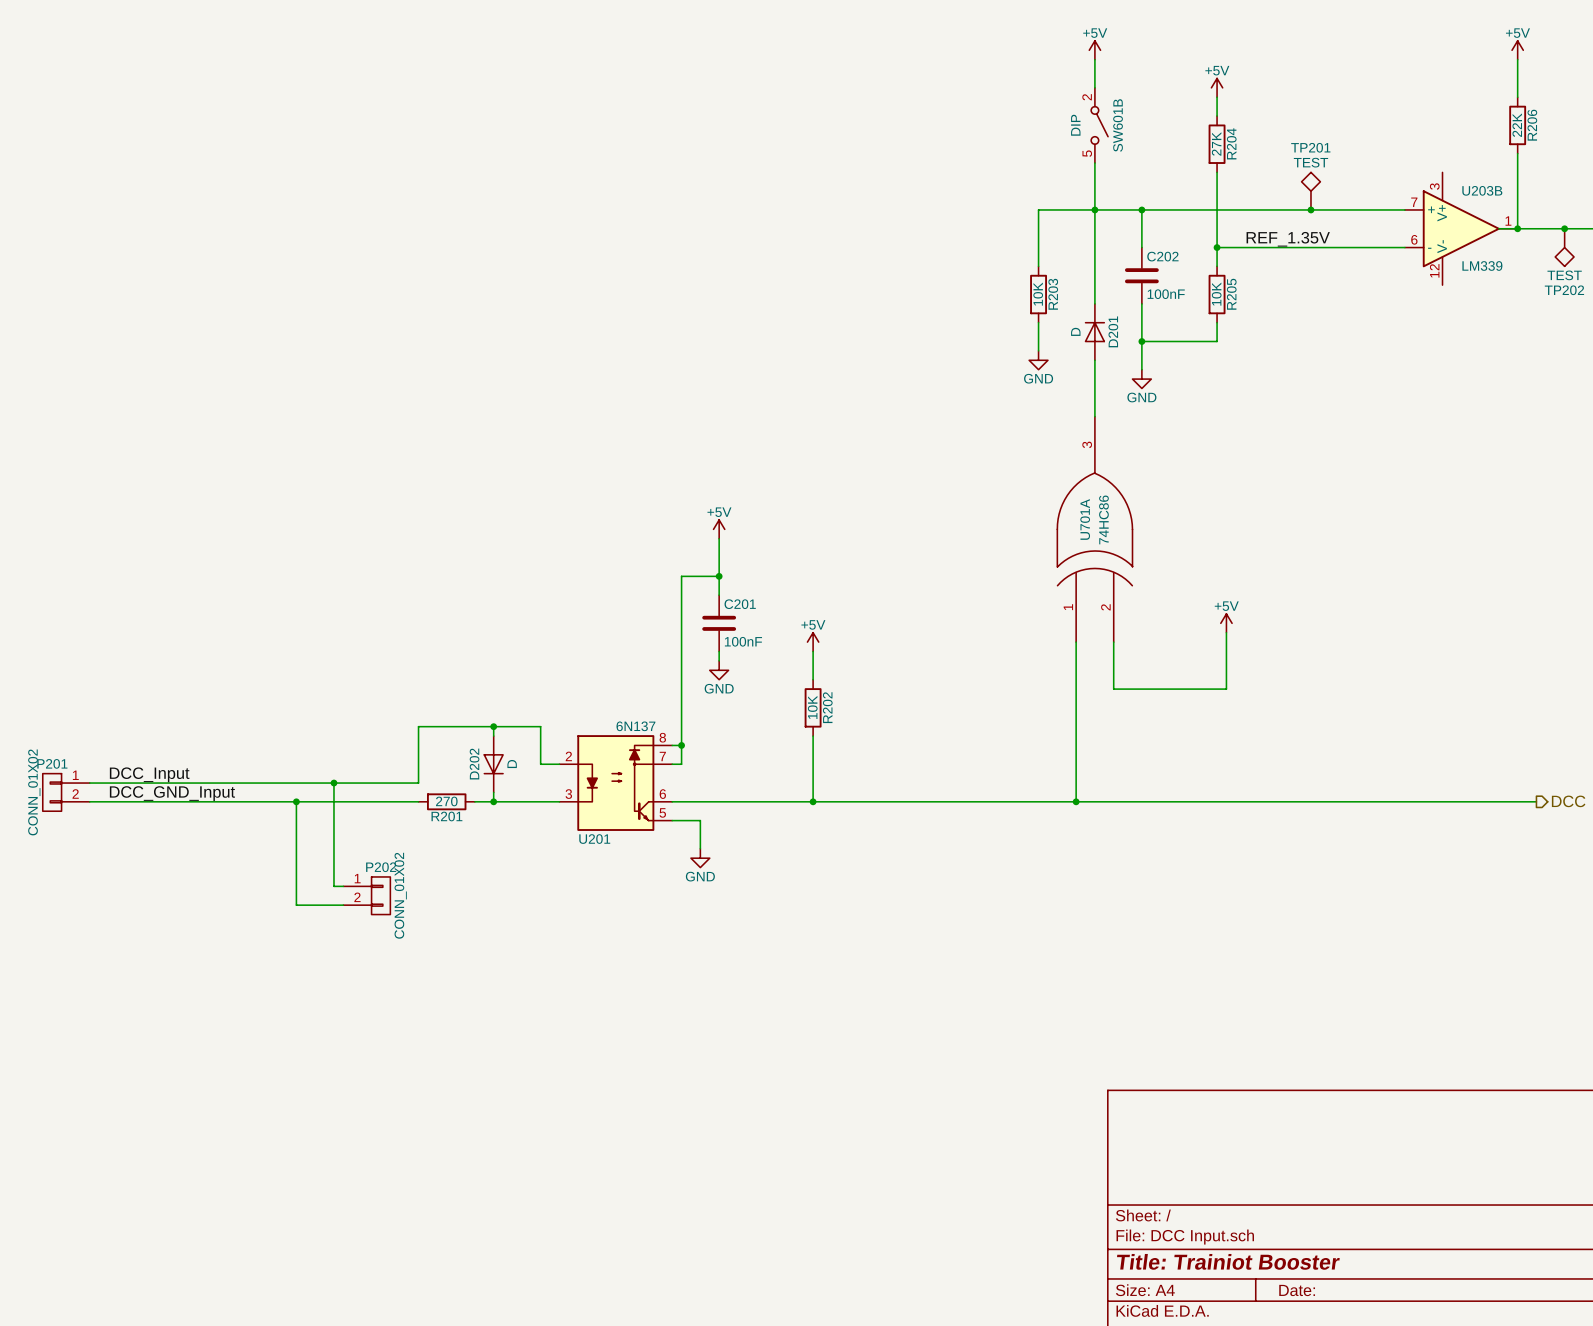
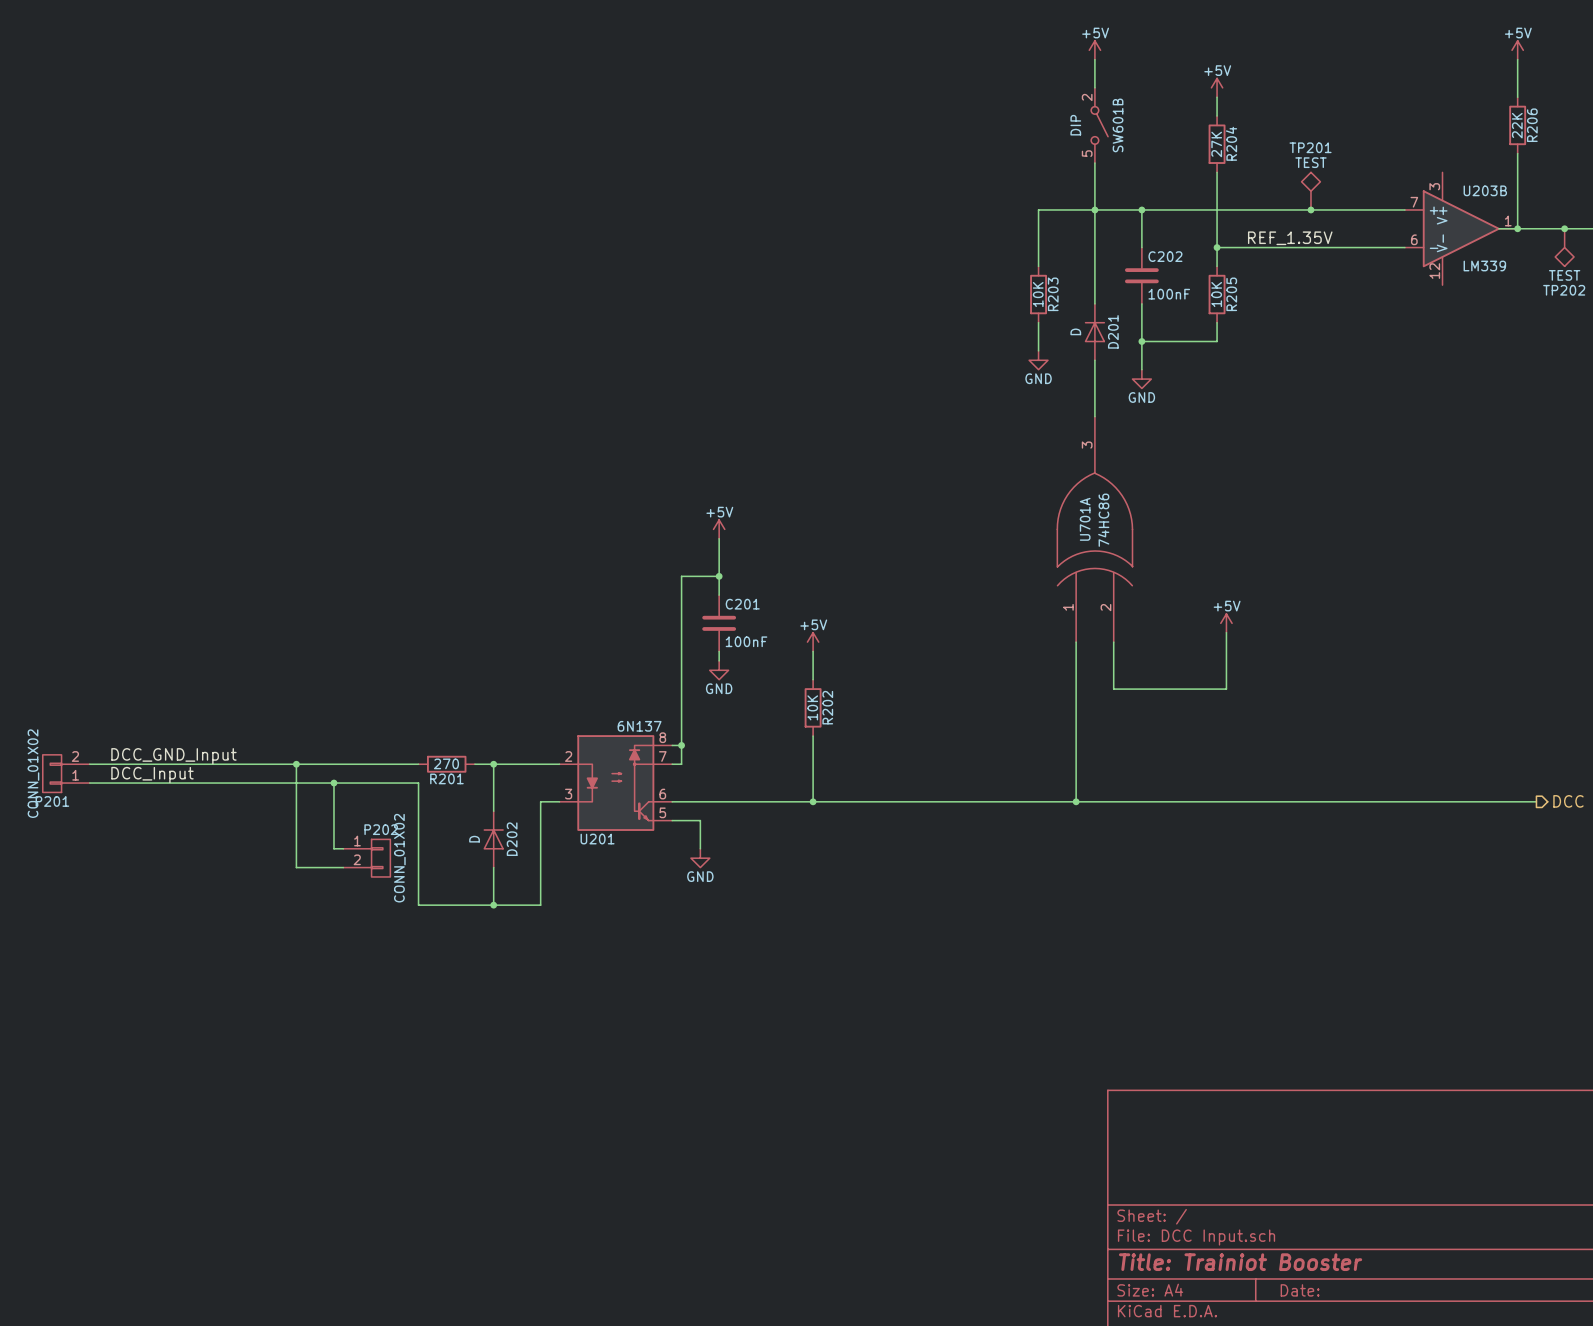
wire: (493, 726) (493, 736) -> (493, 801) (493, 811)
junction: (493, 726) -> none
wire: none -> (296, 764) (296, 801)
D202 rotation: 0° (493, 764) -> 180° (493, 839)
D202 position: (493, 764) -> (493, 839)
junction: none -> (493, 764)
wire: (540, 764) (540, 726) (418, 726) (418, 783) -> (540, 801) (540, 905) (418, 905) (418, 783)
P201 flip: as is (52, 792) -> up-down (52, 773)
label position: DCC_GND_Input (172, 793) -> DCC_GND_Input (173, 756)
wire: (89, 801) (418, 801) -> (89, 764) (418, 764)
junction position: (296, 801) -> (296, 764)
R201 position: (446, 801) -> (446, 764)
wire: (474, 801) (540, 801) -> (474, 764) (540, 764)
junction: (493, 801) -> none
wire: (333, 848) (333, 886) (343, 886) -> (333, 848) (343, 848)
wire: (296, 867) (296, 905) (343, 905) -> (296, 867) (343, 867)
wire: none -> (493, 867) (493, 905)
P202 position: (366, 895) -> (366, 858)
junction: none -> (493, 905)

